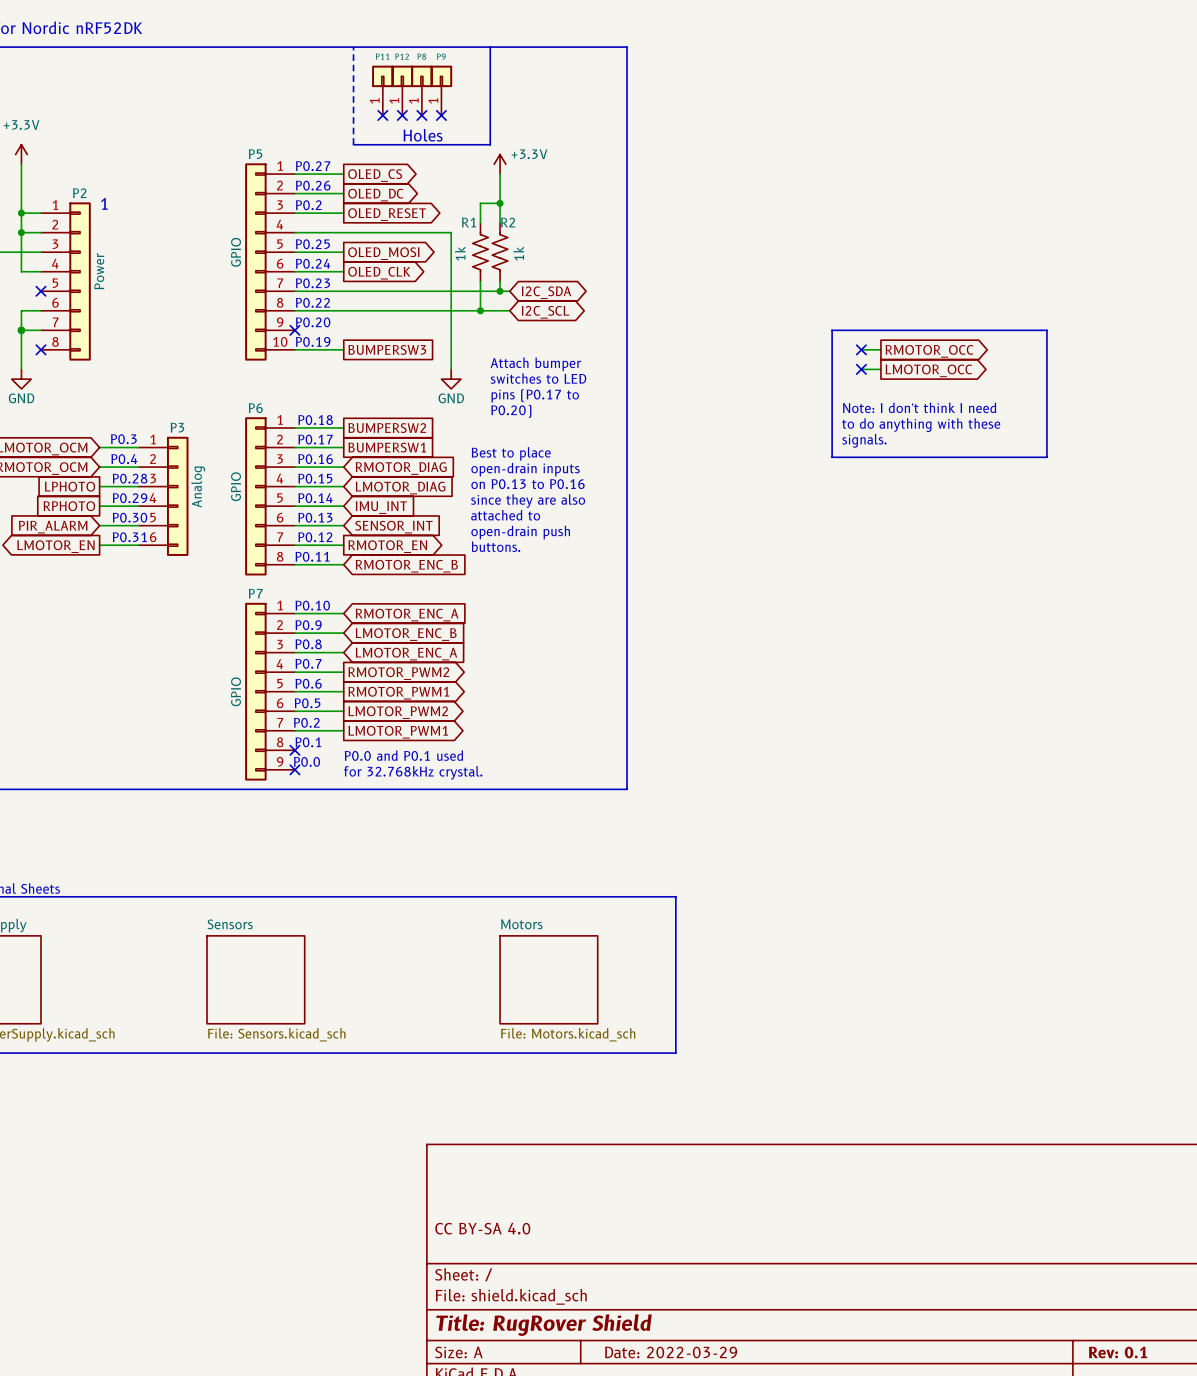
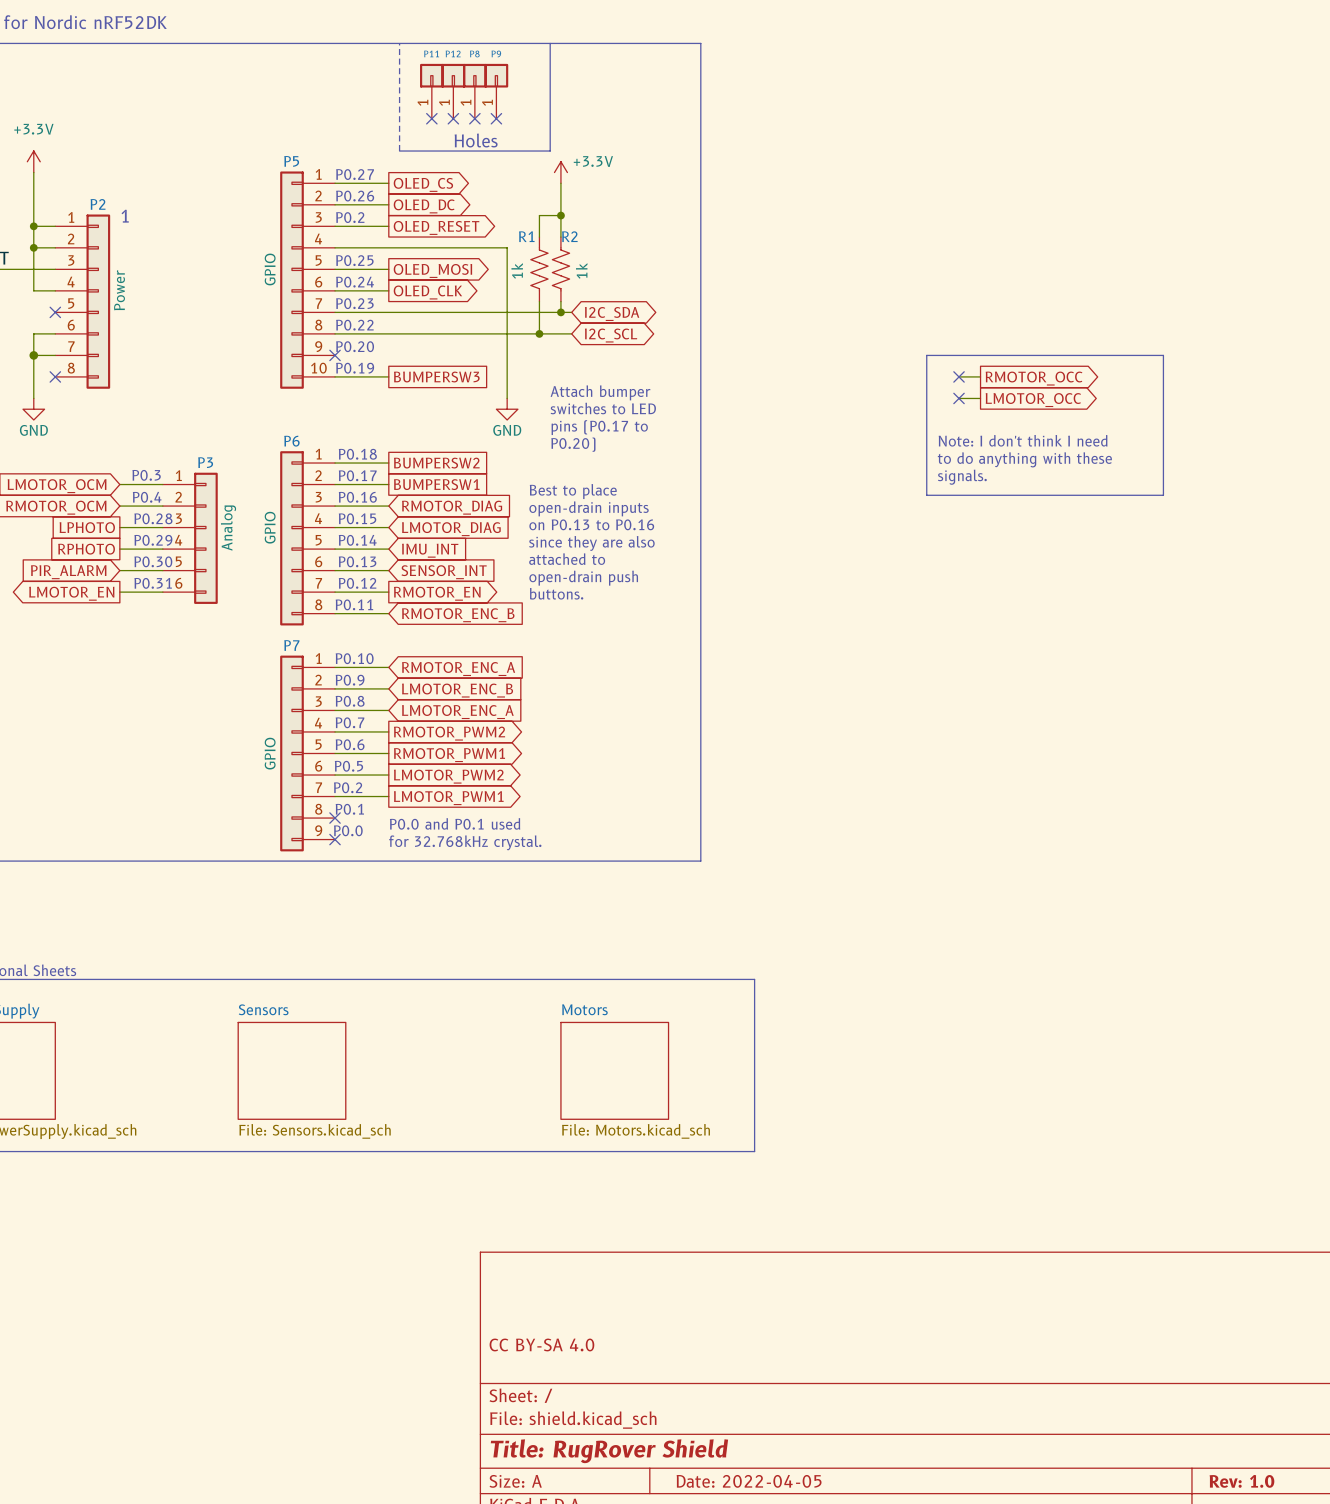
title block: Date: 2022-03-29 (671, 1352) -> Date: 2022-04-05 (749, 1481)
title block: Rev: 0.1 (1118, 1352) -> Rev: 1.0 (1241, 1481)

